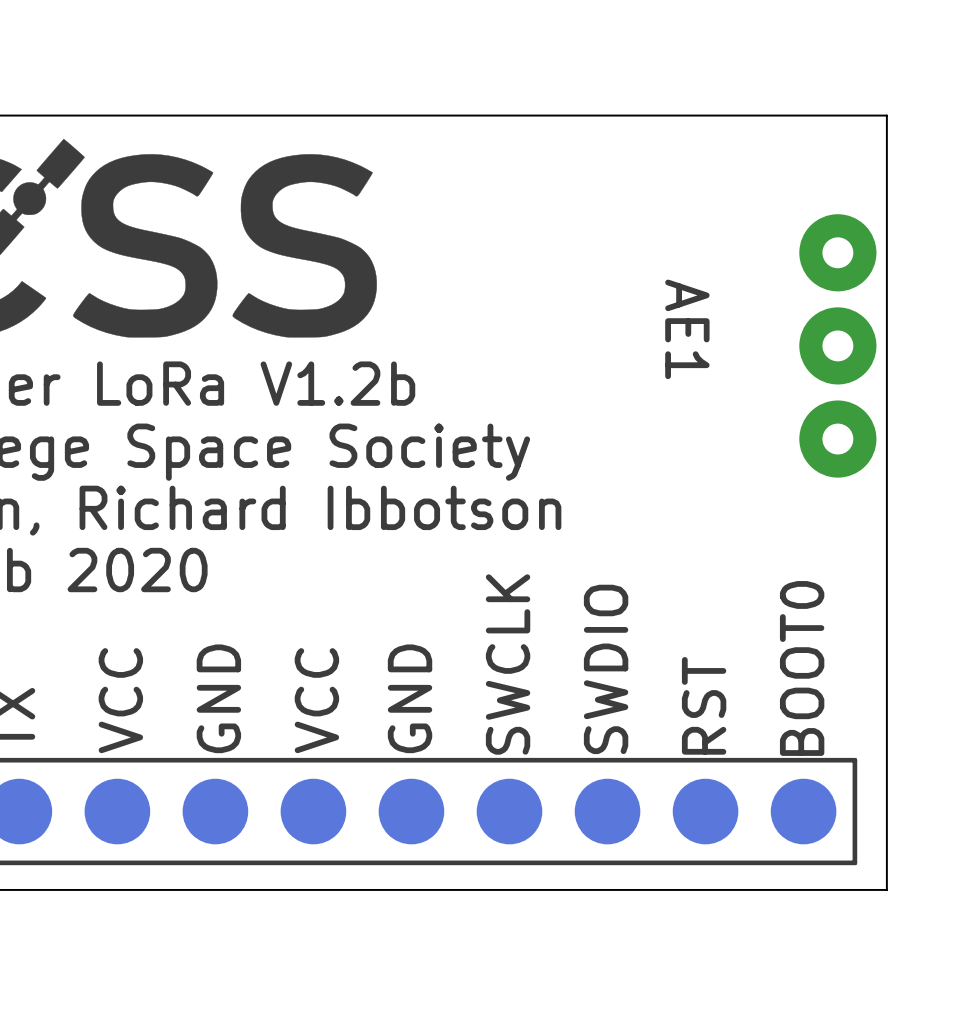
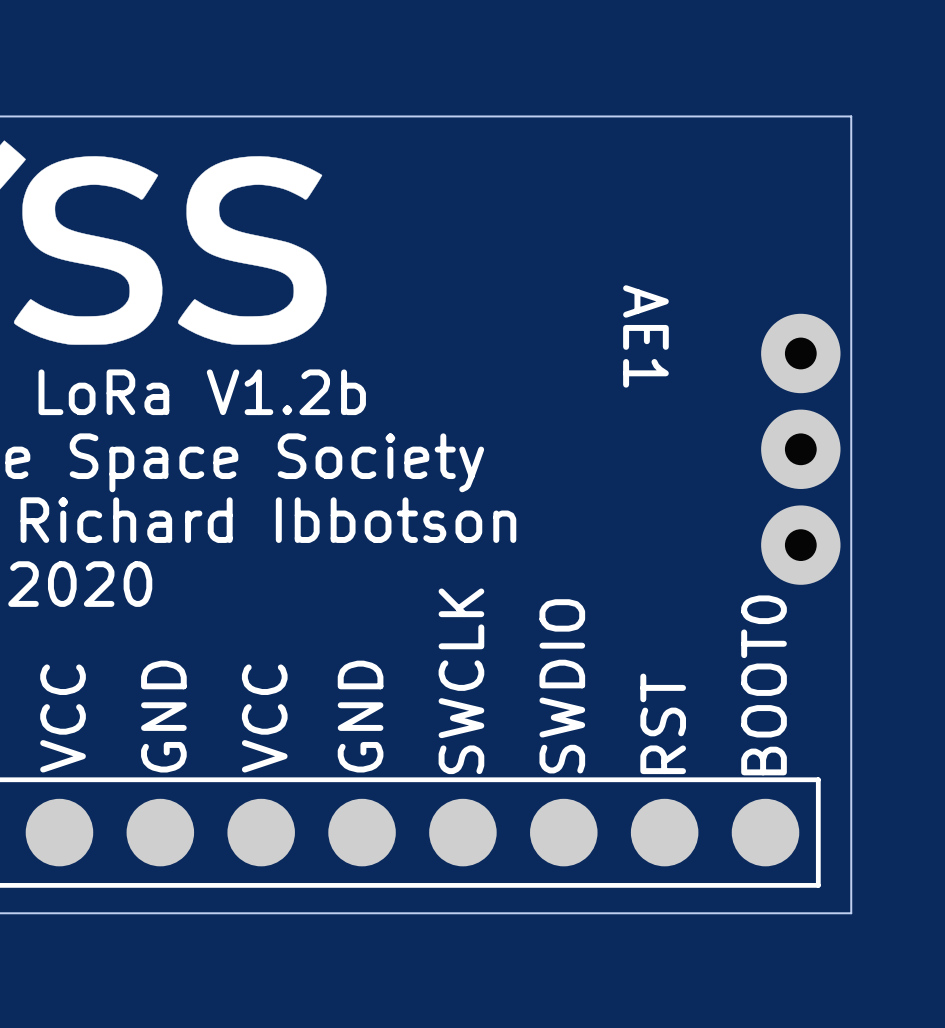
part position: (837, 252) -> (800, 545)

